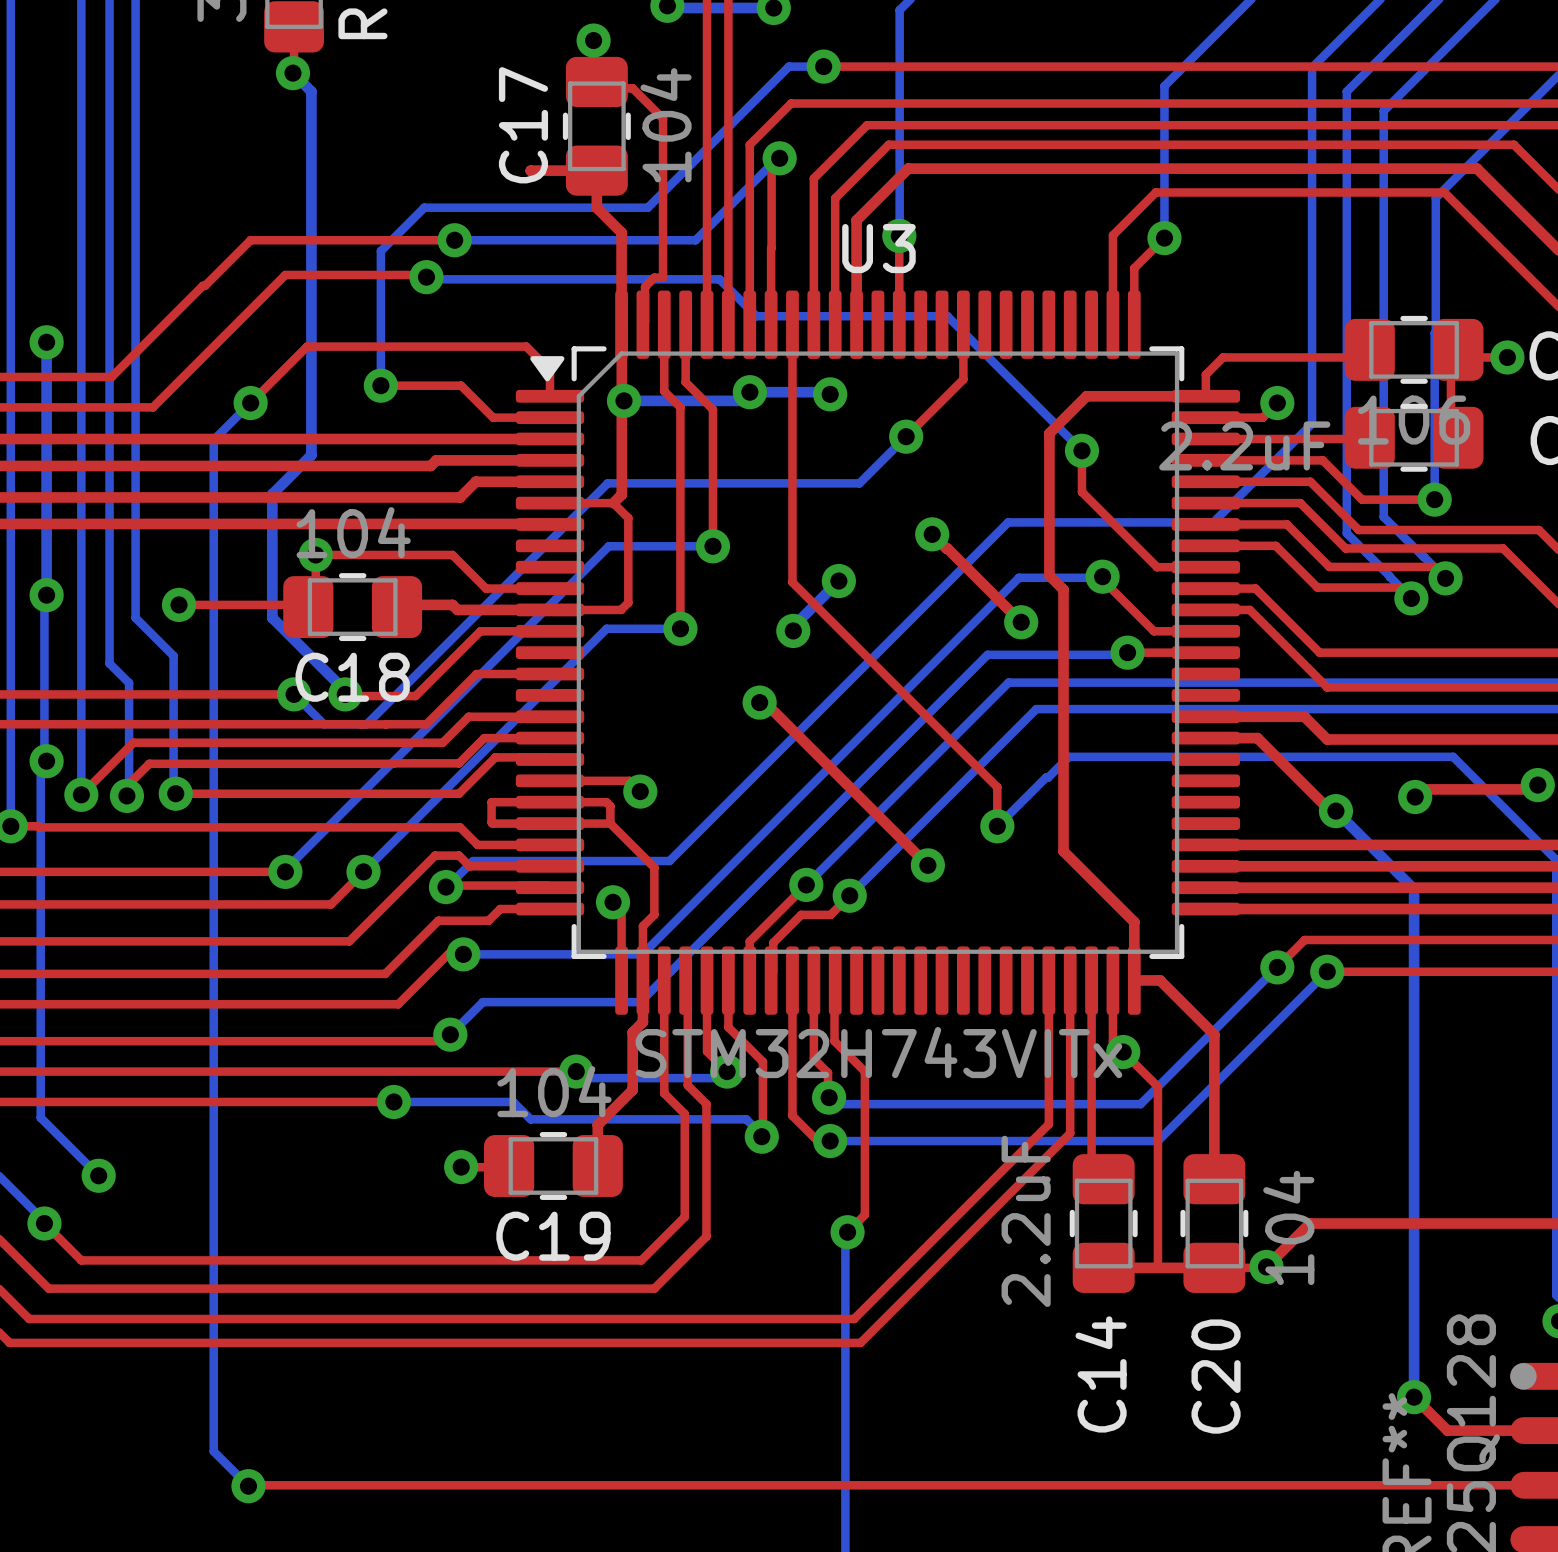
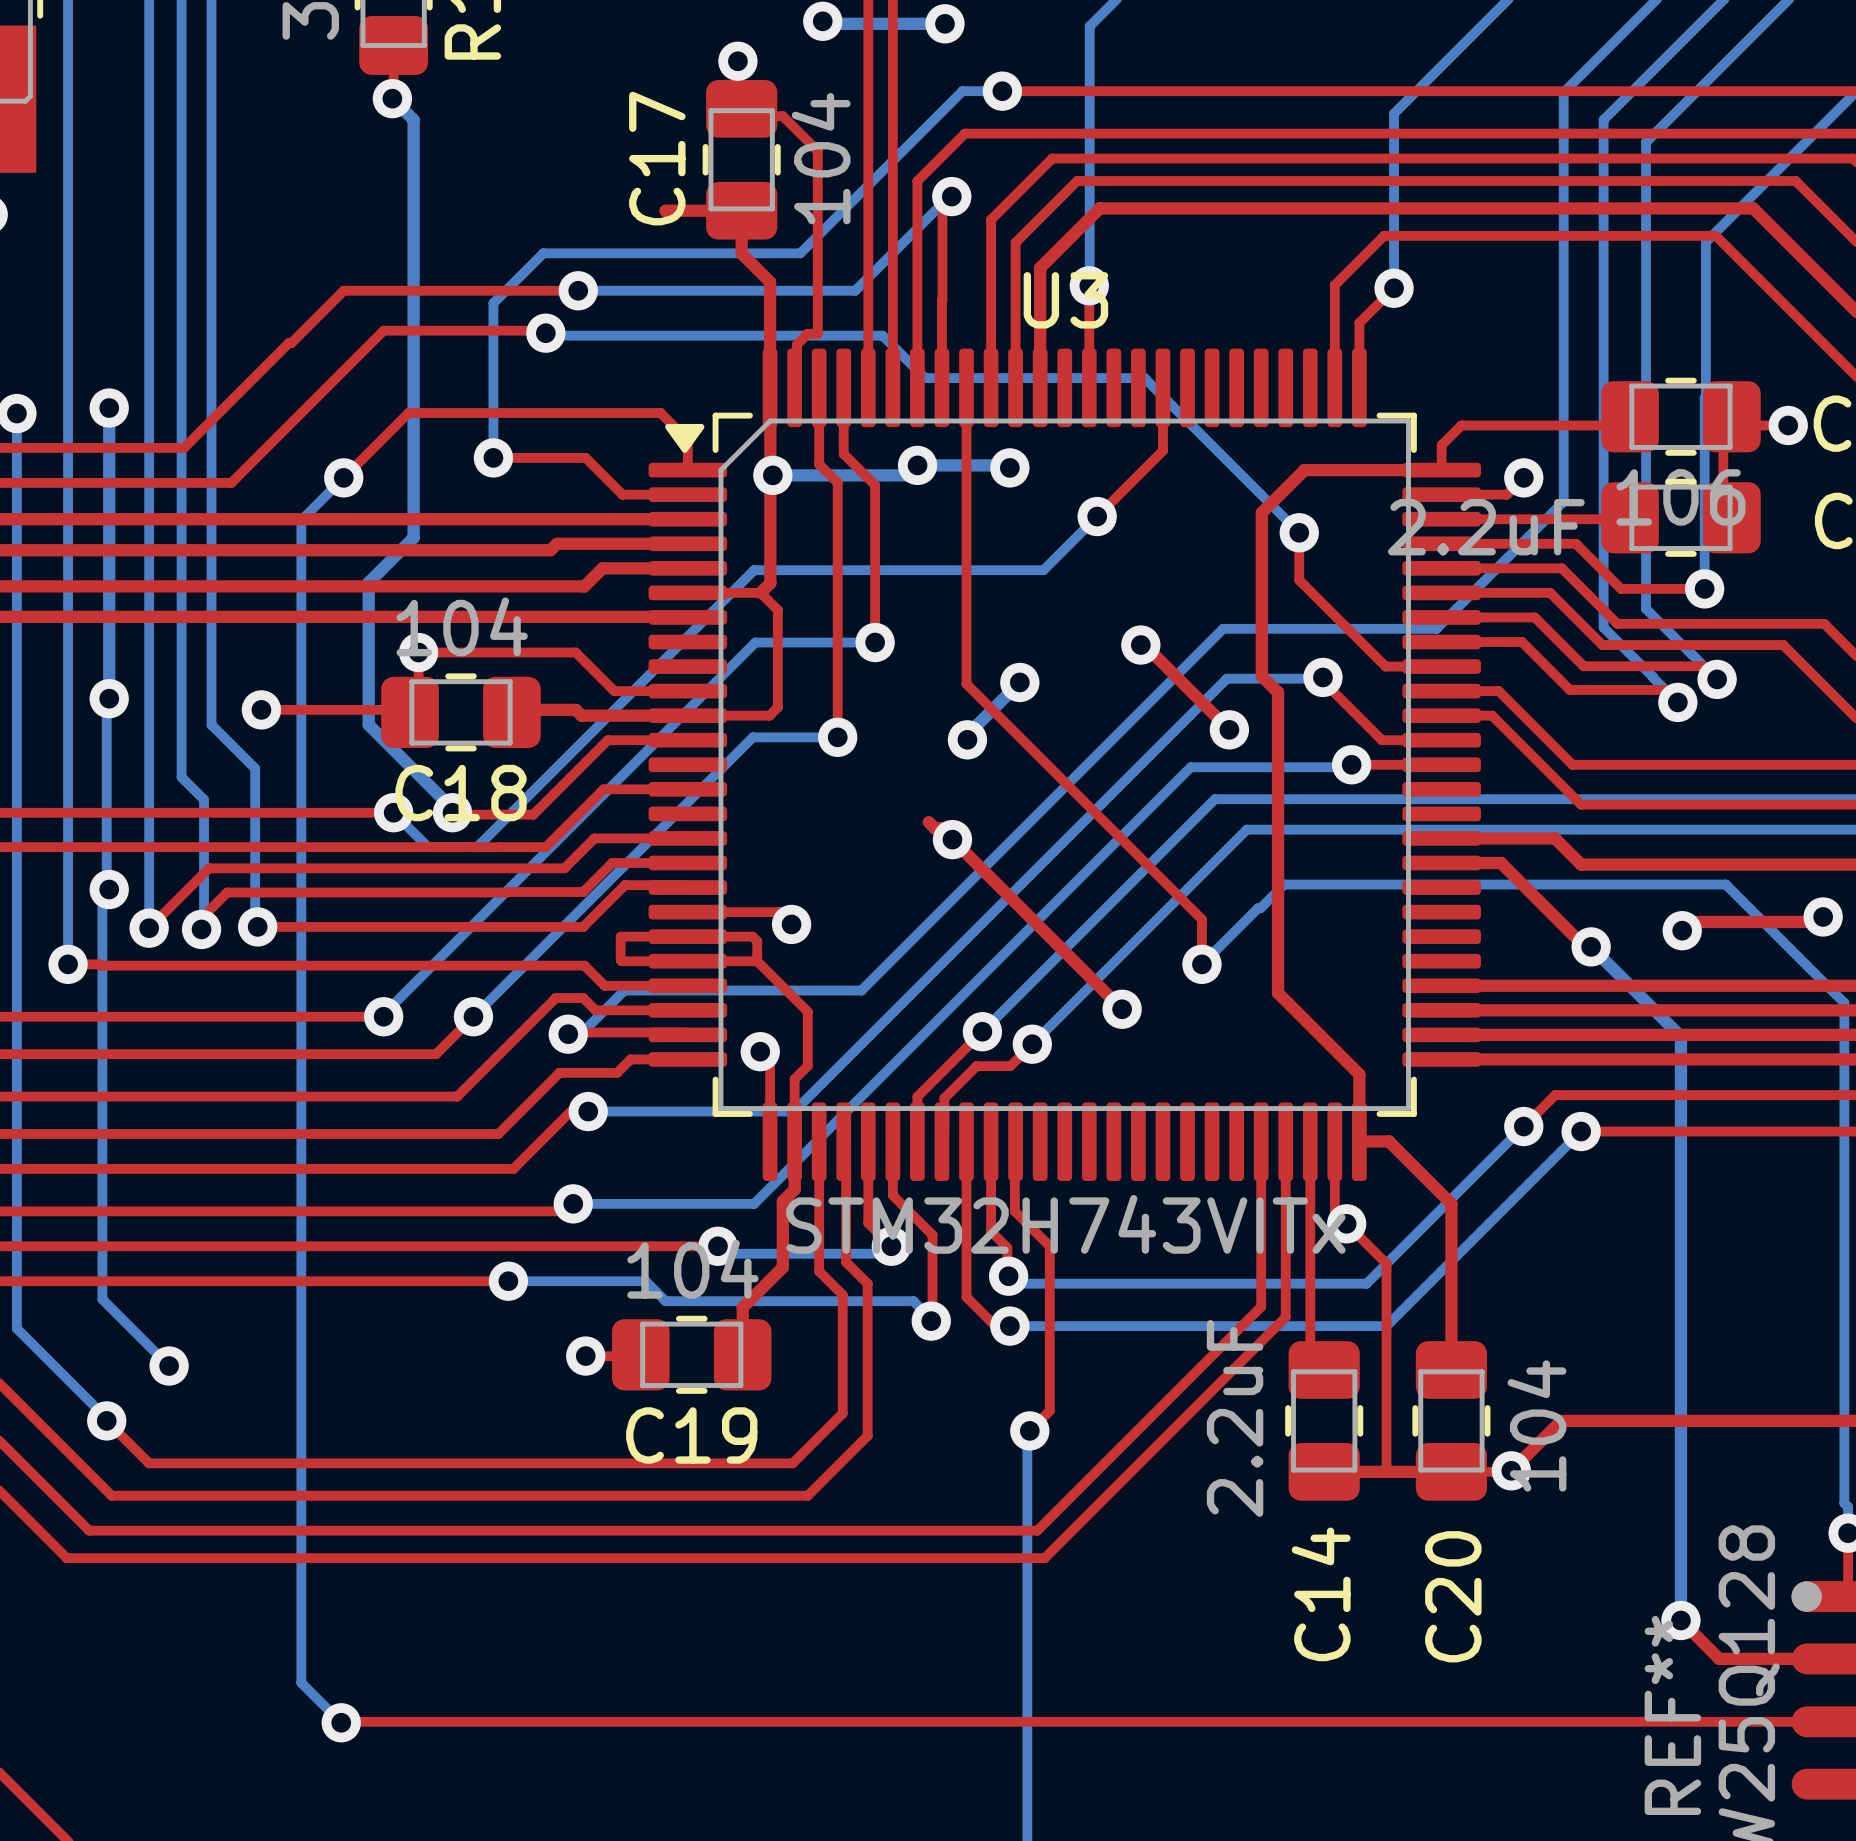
bottom track: (1213, 522) (1008, 522) (669, 861) (473, 861) (447, 887) -> (1450, 615) (1436, 628) (1223, 628) (861, 990) (624, 990) (580, 1034) (569, 1034)
via position: (932, 534) -> (1140, 645)
via position: (759, 702) -> (952, 839)
bottom track: (640, 1002) (482, 1002) (450, 1034) -> (791, 1166) (754, 1203) (573, 1203)

